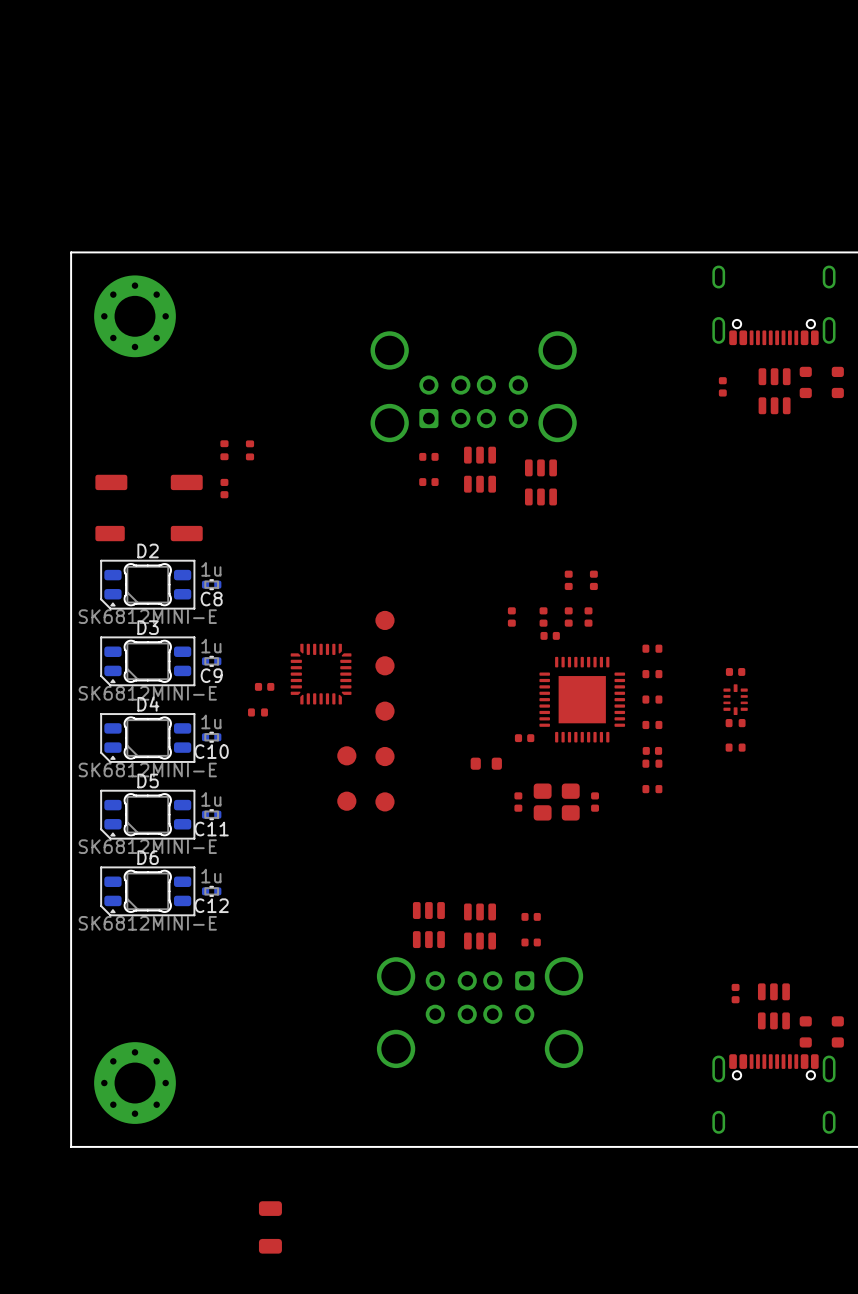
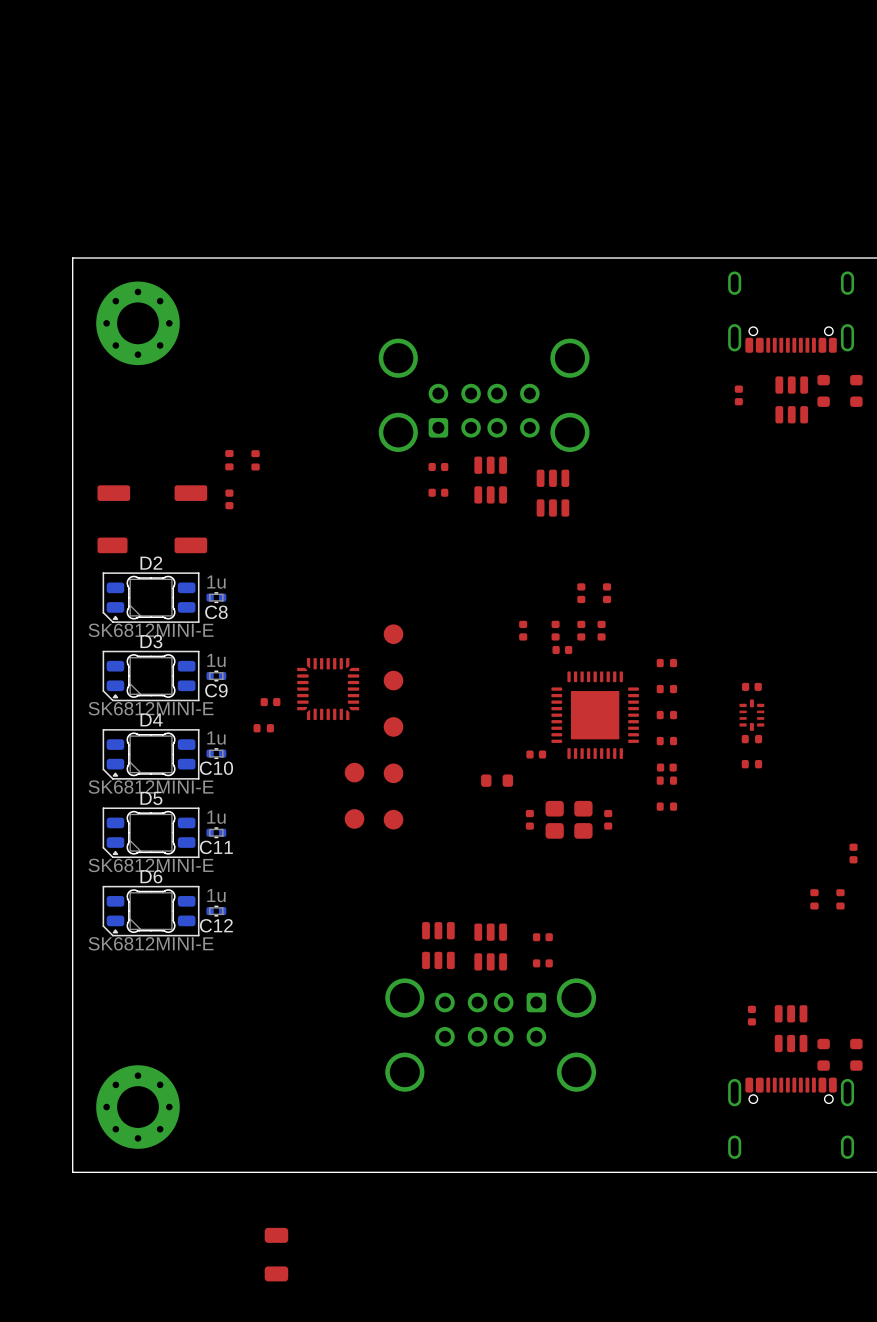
part: none -> (853, 853)
part: none -> (814, 899)
part: none -> (840, 899)

